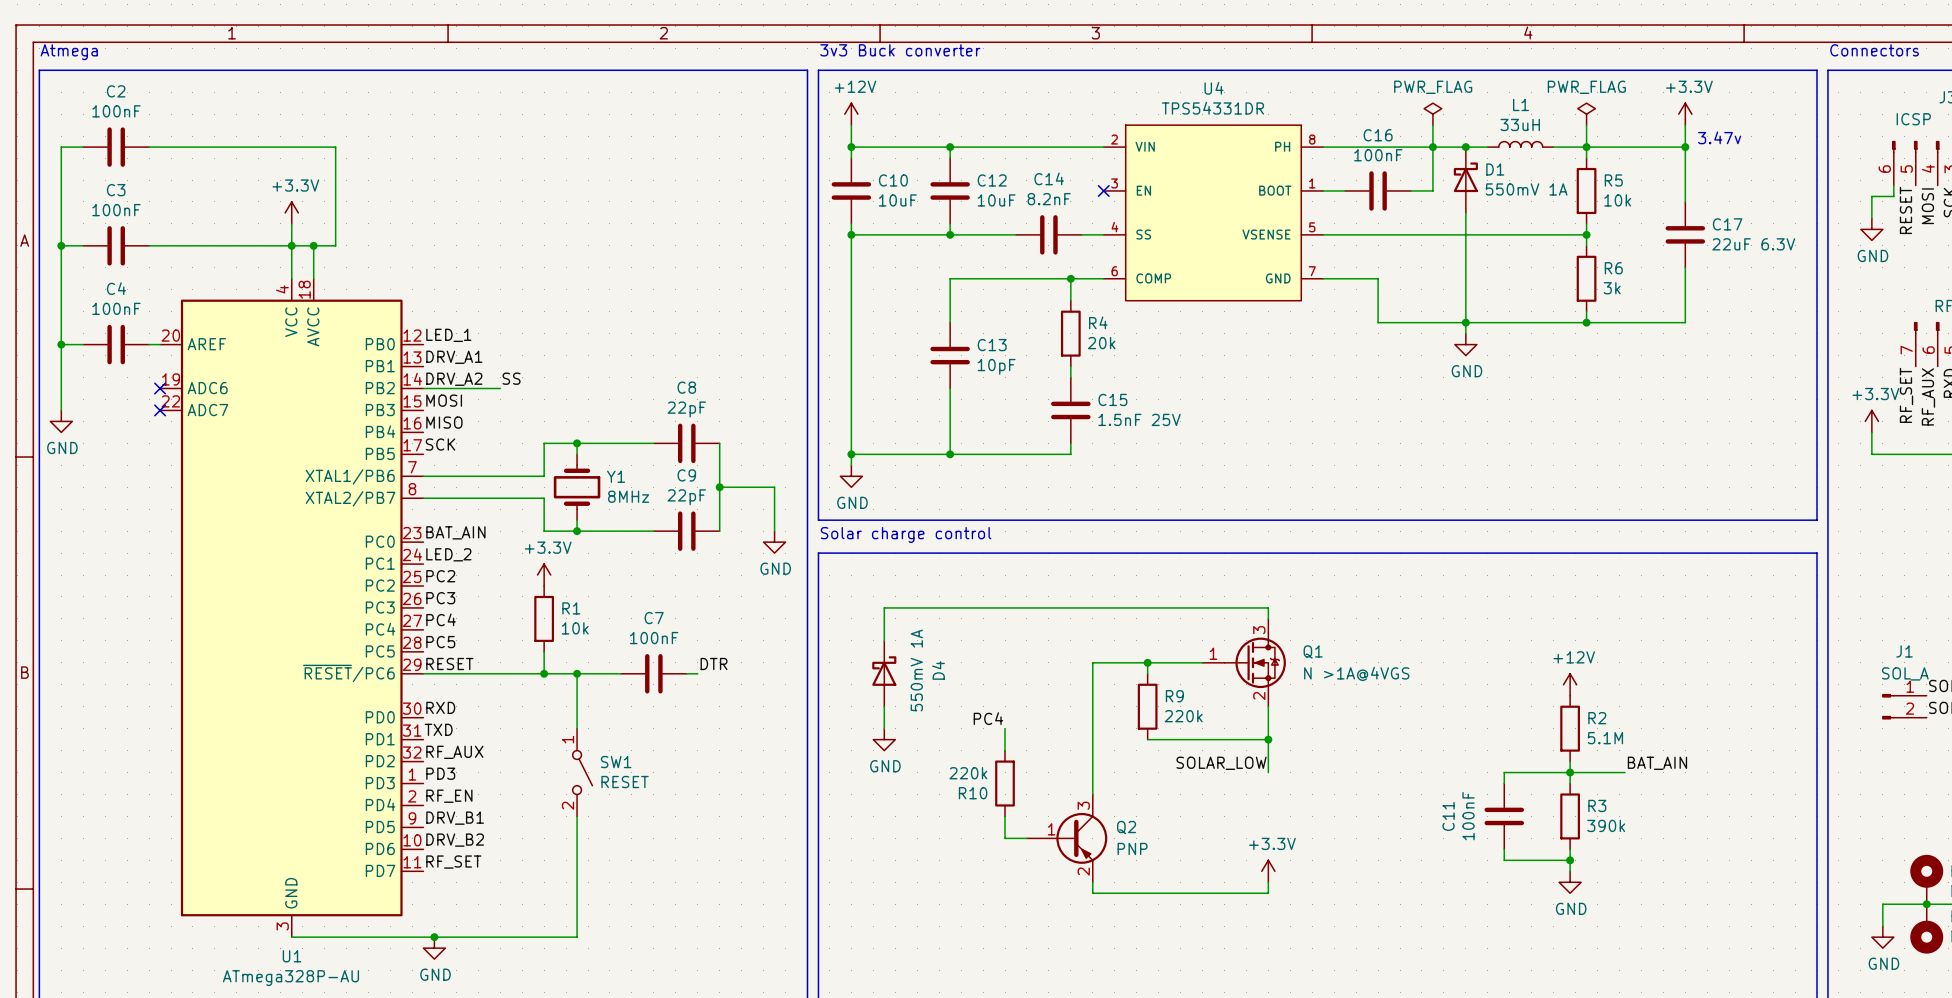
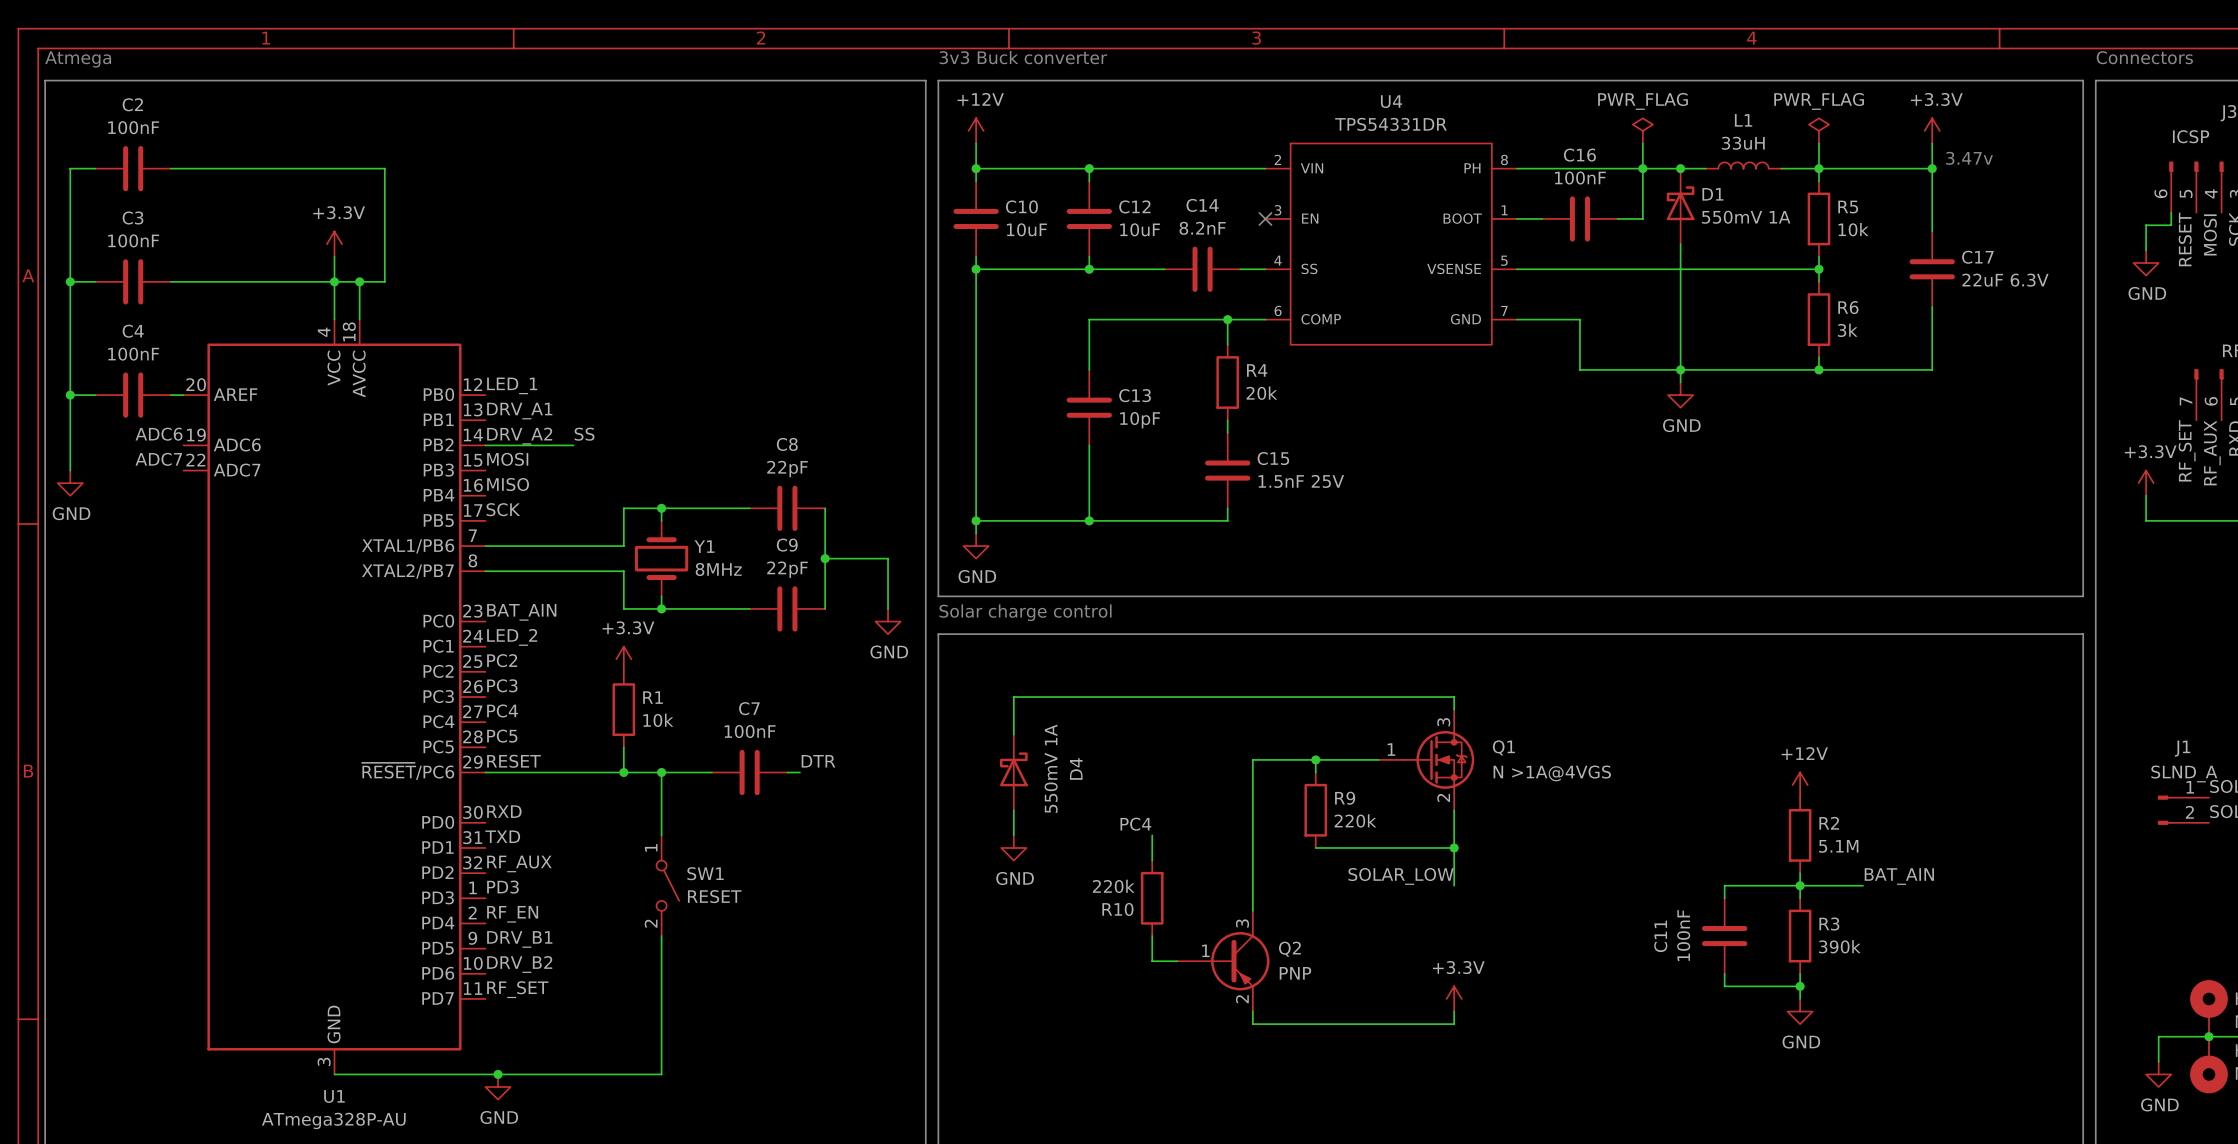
label: none -> ADC6 (158, 434)
no-connect mark: (160, 388) -> none
label: none -> ADC7 (158, 459)
no-connect mark: (160, 410) -> none
J1 value: SOL_A (1905, 673) -> SLND_A (2184, 773)

